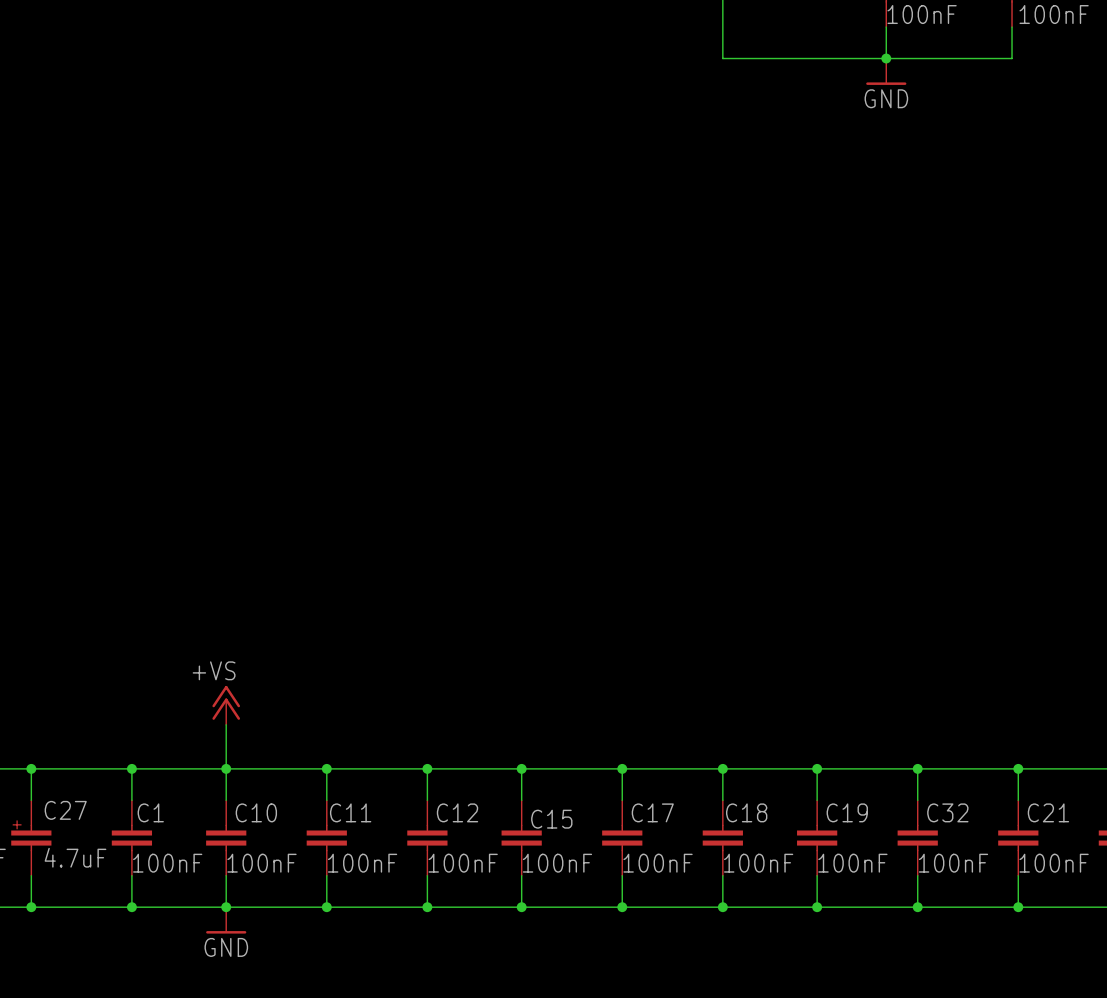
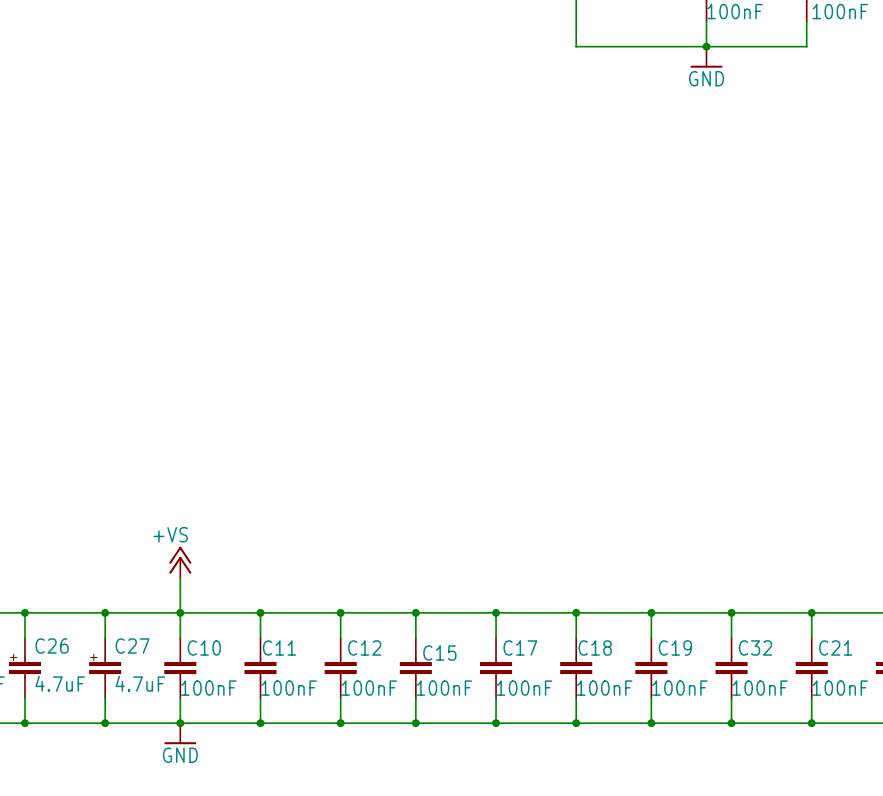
C27 name: C27 (65, 810) -> C26 (52, 645)
C1: 100nF (131, 838) -> none
C27: none -> 4.7uF (105, 668)

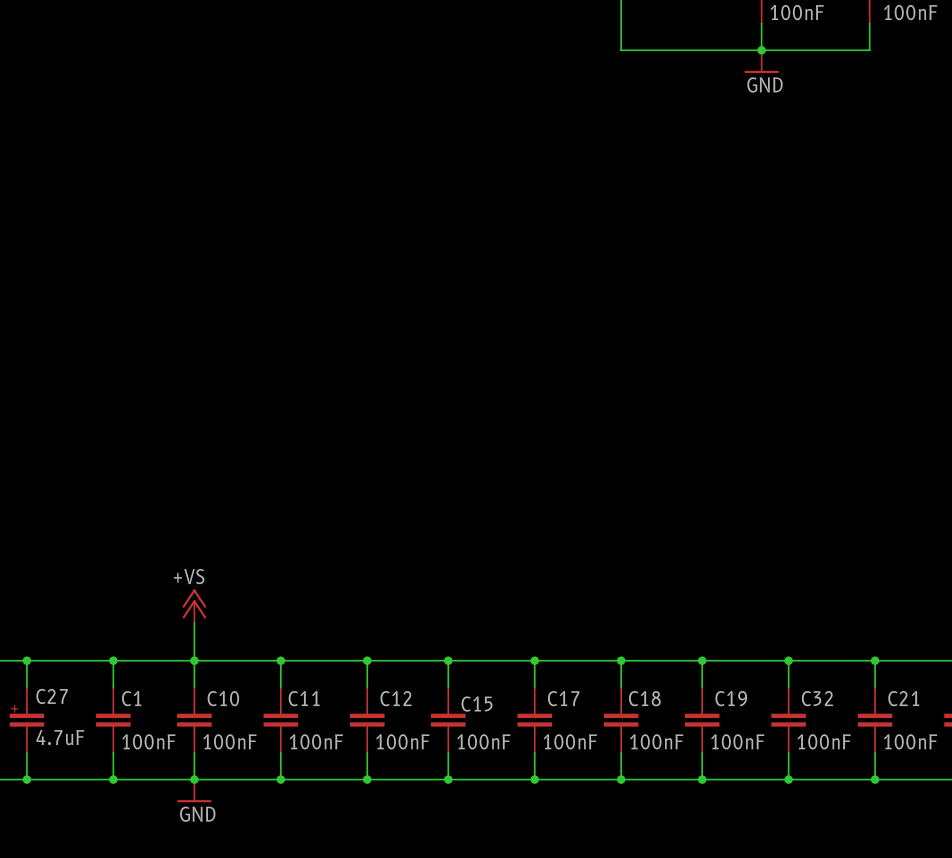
C26 name: C26 (52, 645) -> C27 (52, 696)
C27: 4.7uF (105, 668) -> none
C1: none -> 100nF (113, 720)

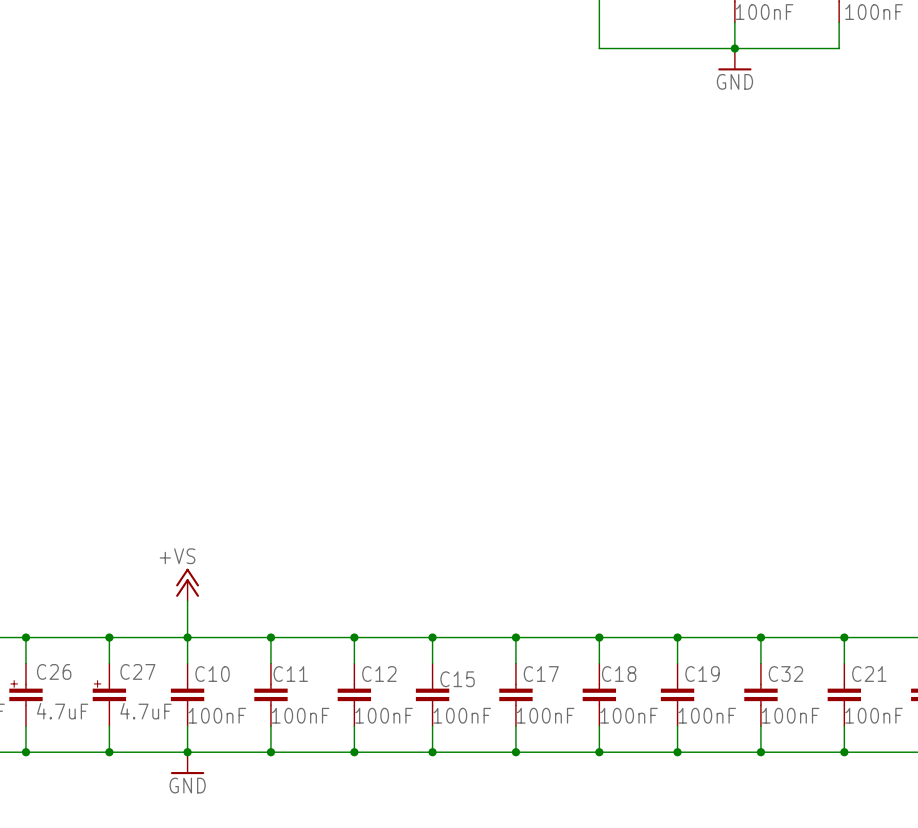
C27 name: C27 (52, 696) -> C26 (54, 671)
C1: 100nF (113, 720) -> none
C27: none -> 4.7uF (109, 694)

